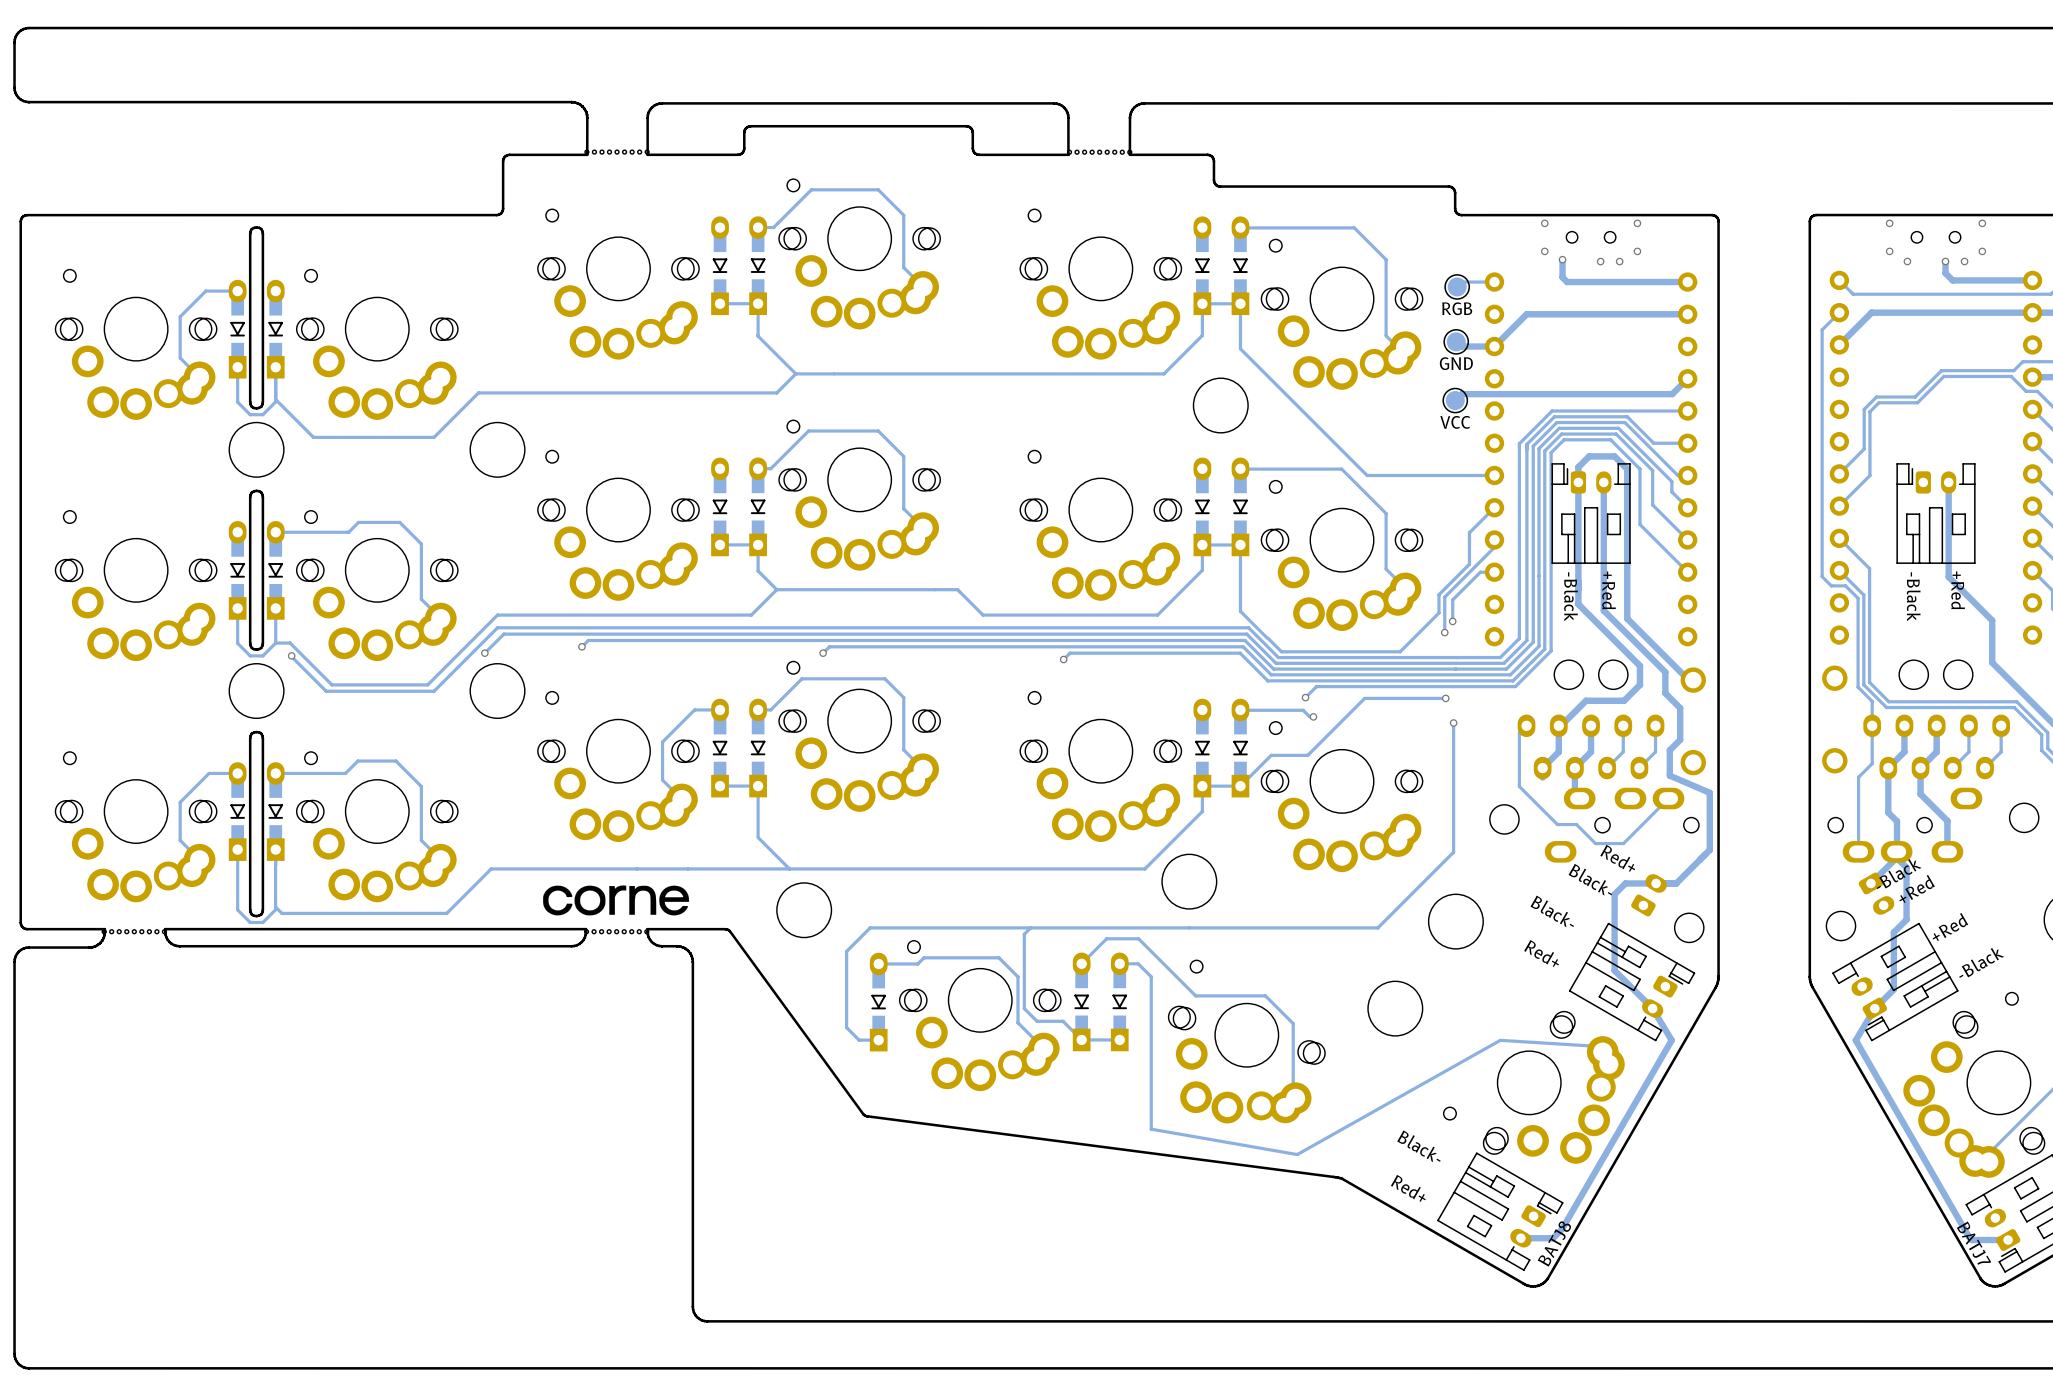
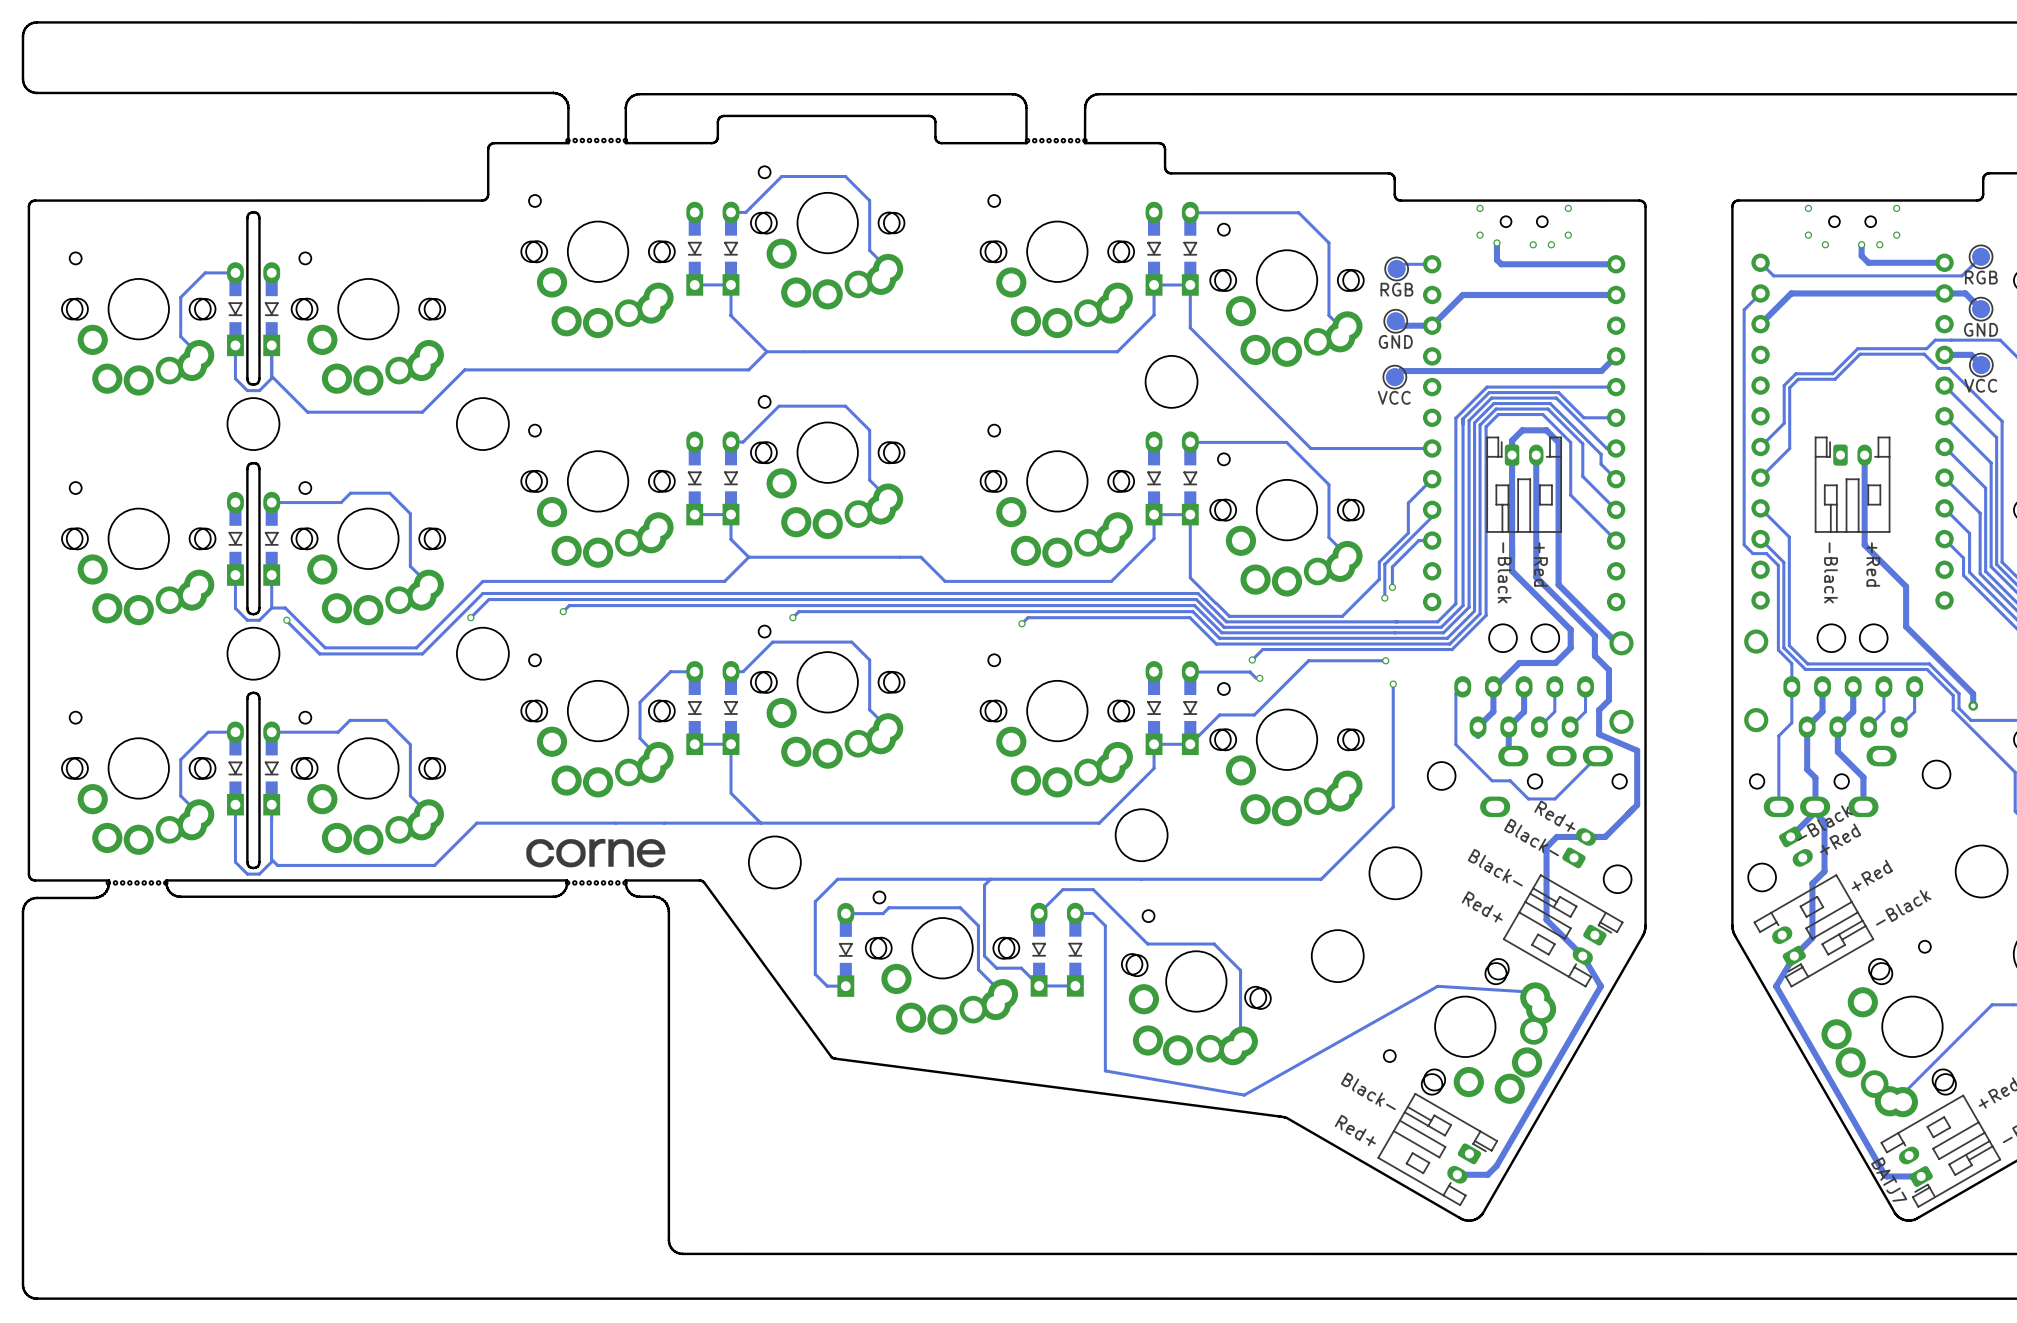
BATJ8 name: BATJ8 (1554, 1244) -> none

